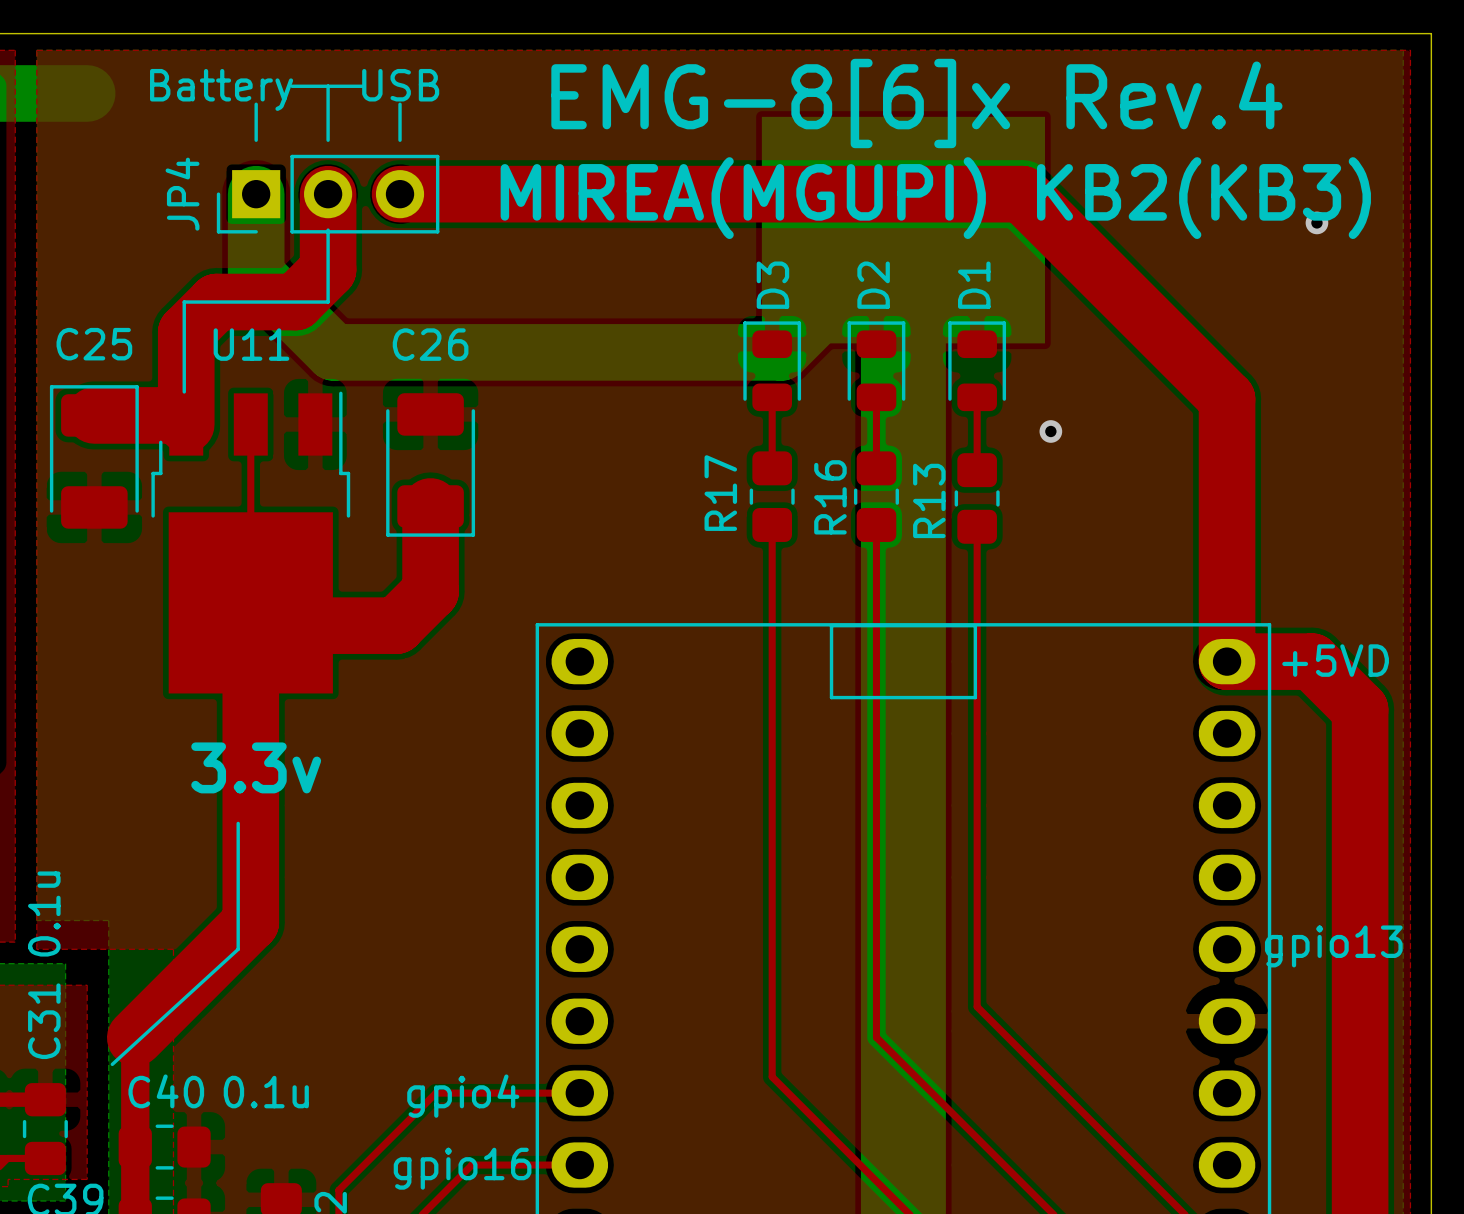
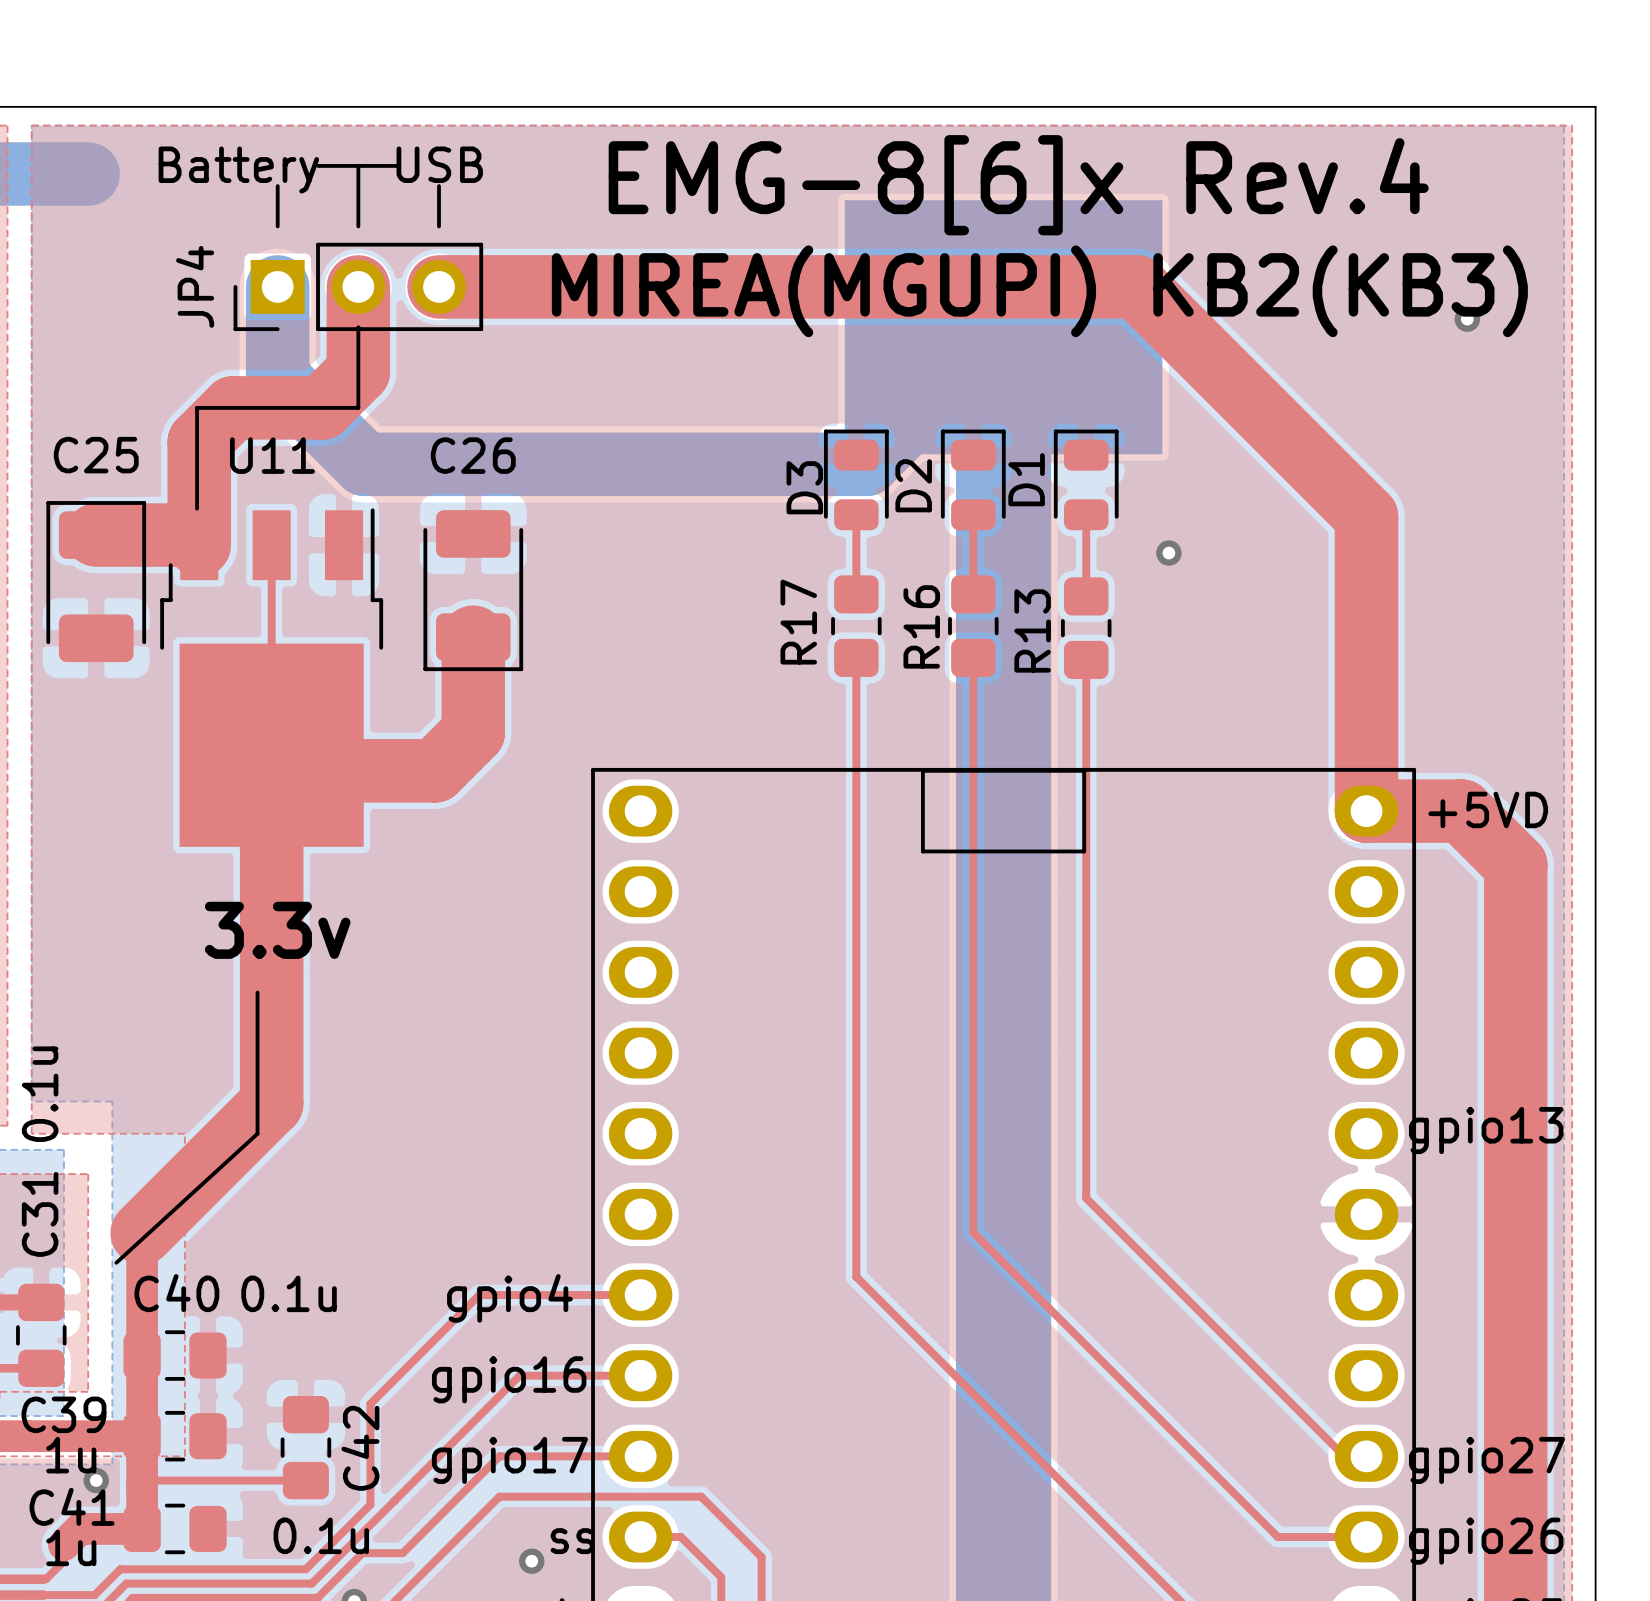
D3 name position: D3 (772, 285) -> D3 (804, 487)
D2 name position: D2 (873, 285) -> D2 (913, 485)
D1 name position: D1 (974, 285) -> D1 (1026, 479)

